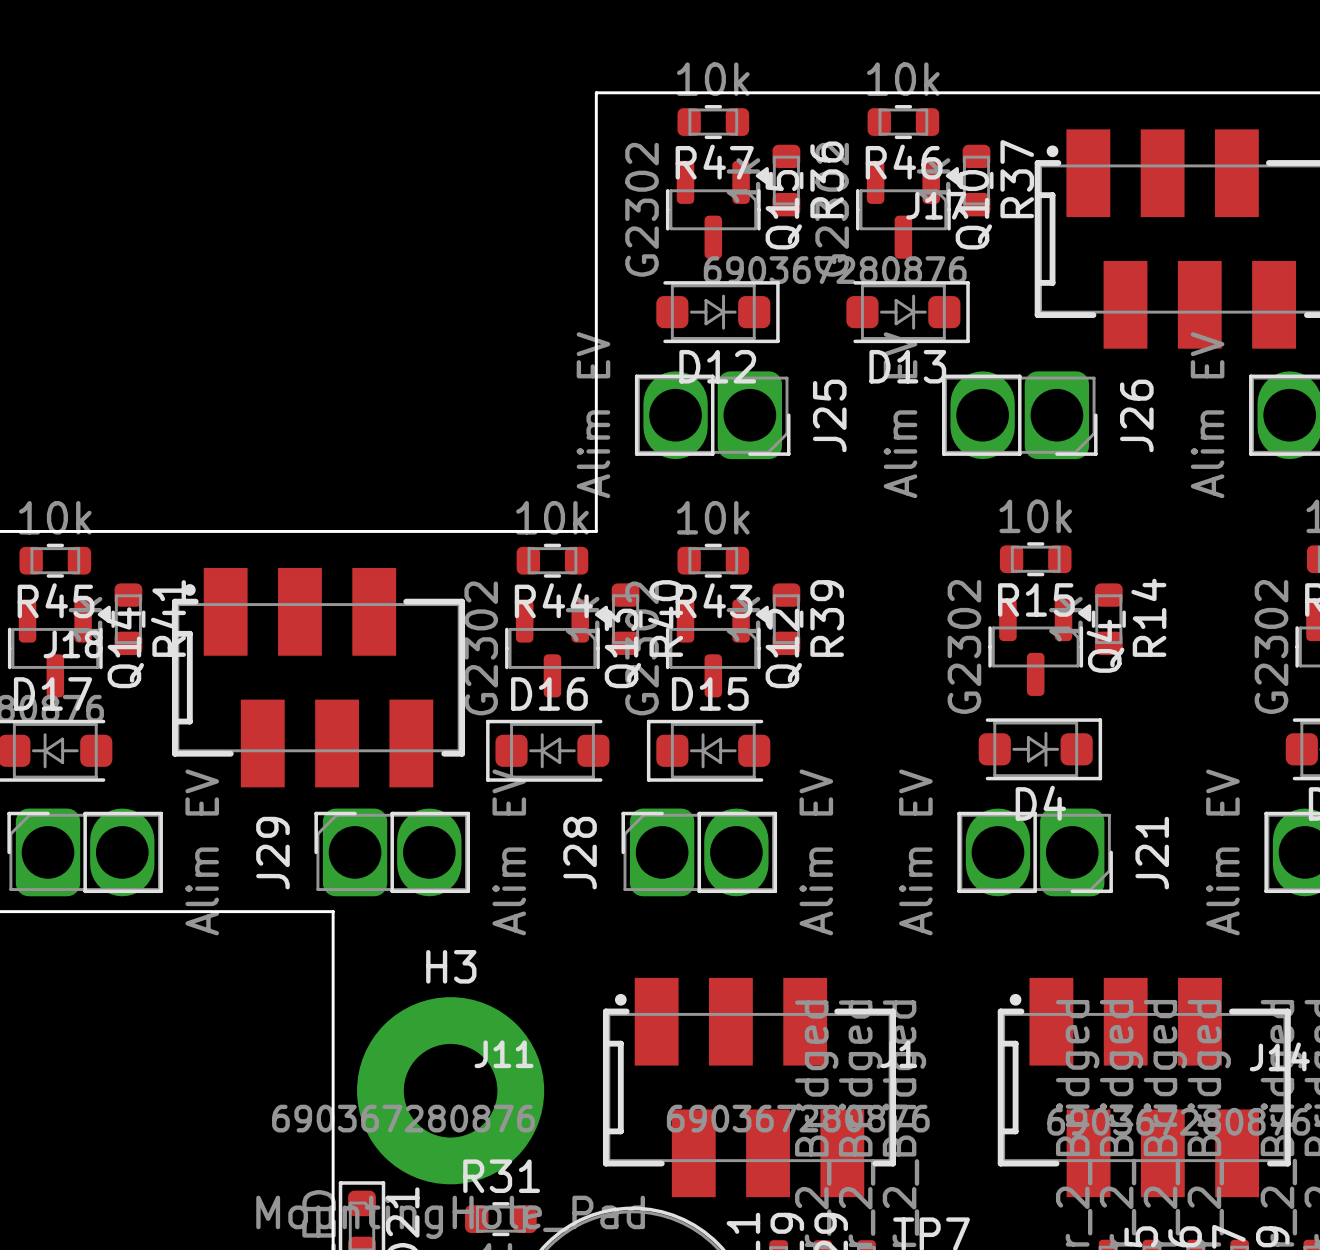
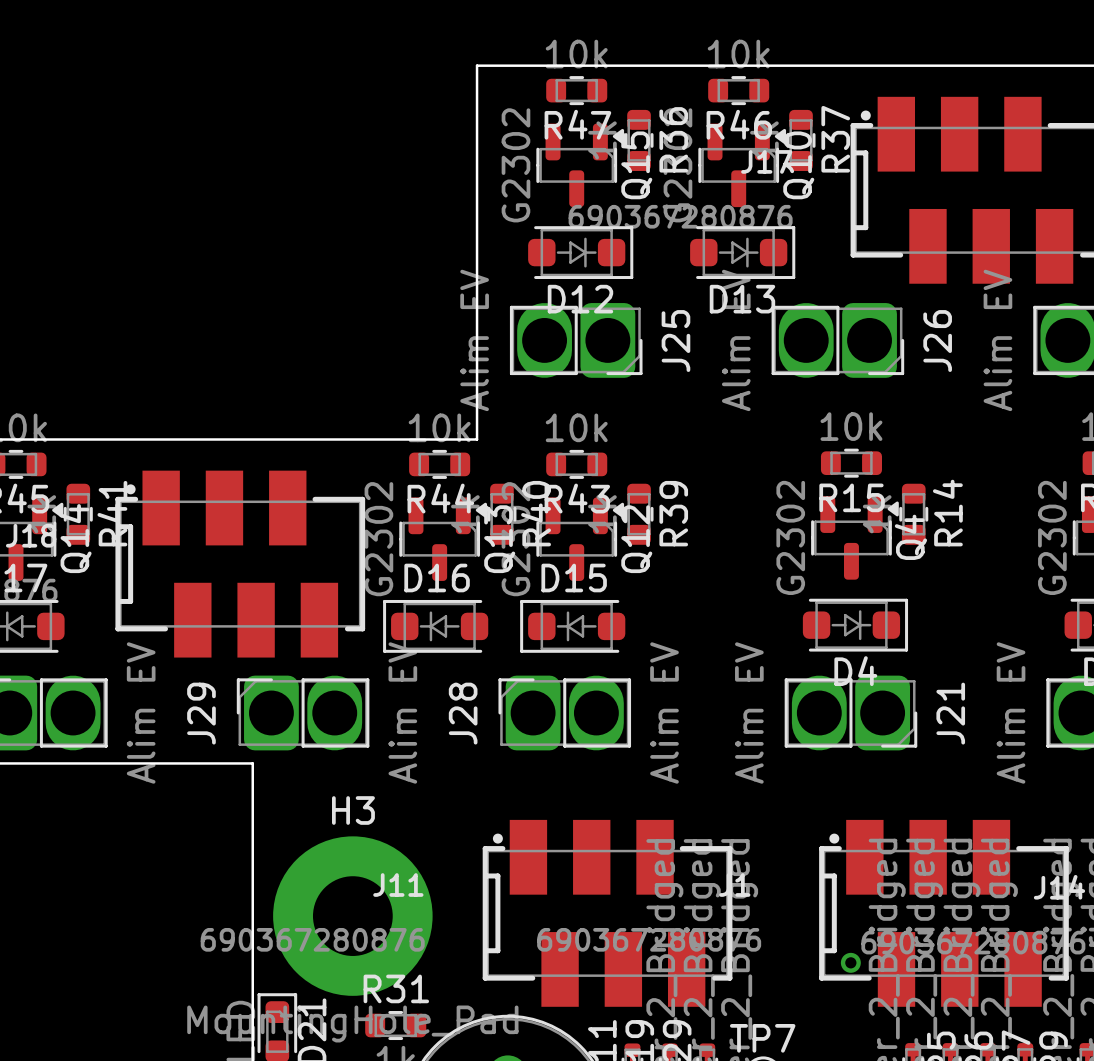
via: none -> (850, 962)

